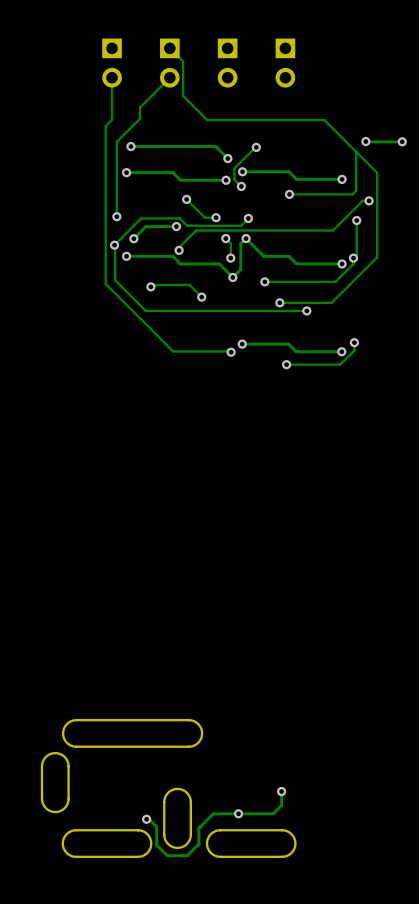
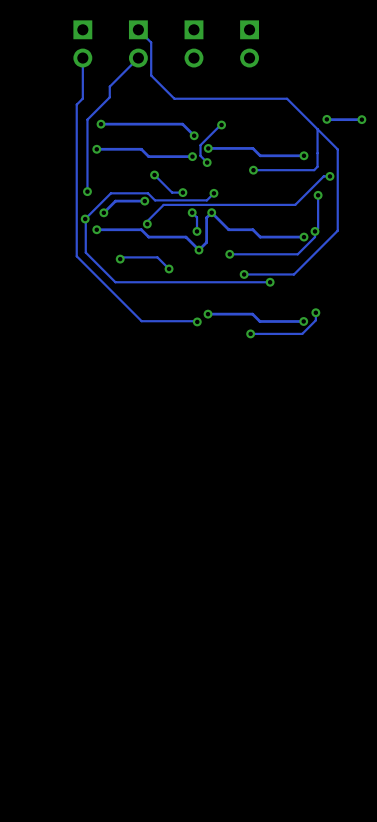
board edge: (189, 720) (76, 720) (74, 720) (66, 724) (63, 735) (66, 742) (74, 746) (190, 746) (198, 742) (202, 733) (198, 724) (193, 721) (192, 720) (190, 720) (188, 720) -> none
board edge: (68, 766) (67, 803) (60, 811) (50, 811) (44, 806) (42, 800) (42, 761) (49, 754) (56, 753) (65, 757) (68, 766) -> none
track: (281, 791) (281, 805) (273, 813) (213, 813) (198, 828) (198, 844) (187, 855) (167, 855) (156, 845) (156, 826) (149, 819) (146, 819) -> none
via: (281, 791) -> none
board edge: (190, 802) (189, 839) (182, 846) (172, 846) (167, 842) (164, 836) (165, 797) (170, 790) (179, 789) (188, 794) (190, 802) -> none
via: (238, 813) -> none
via: (146, 819) -> none
board edge: (137, 830) (147, 834) (151, 843) (147, 852) (137, 856) (71, 855) (64, 849) (63, 840) (68, 832) (76, 830) -> none
board edge: (138, 830) (76, 830) -> none
board edge: (282, 830) (216, 830) (208, 836) (207, 846) (212, 854) (218, 856) (285, 856) (292, 851) (295, 841) (290, 833) (282, 830) -> none

